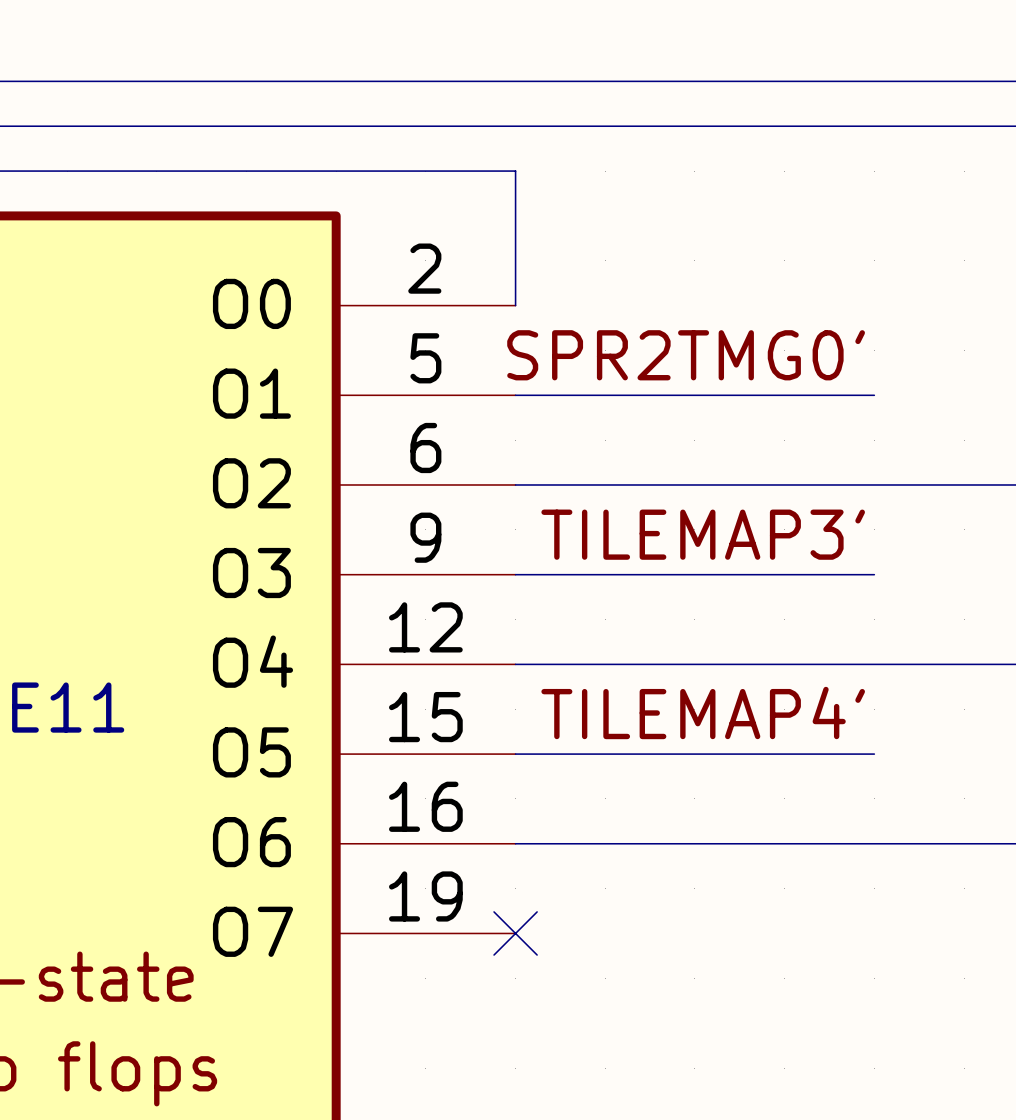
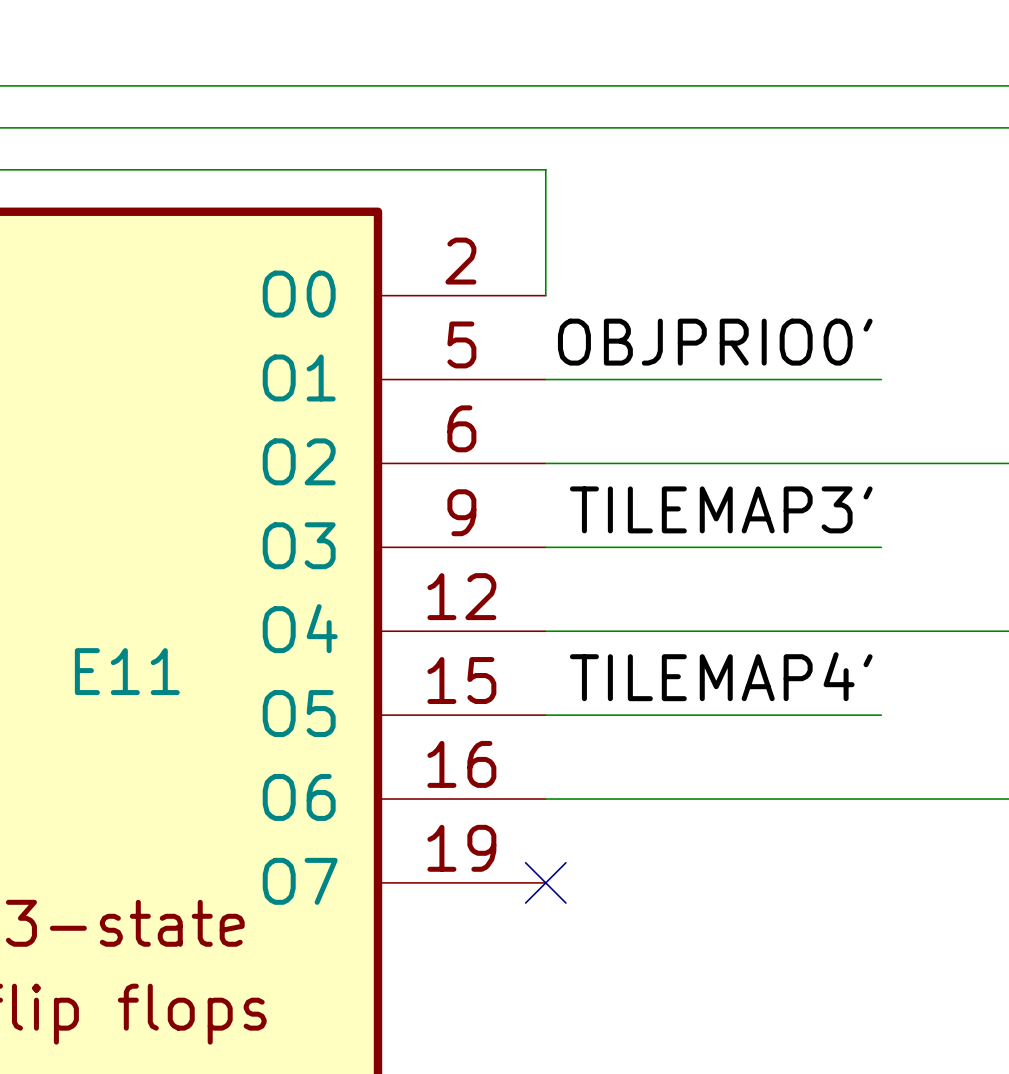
label: SPR2TMG0' (686, 355) -> OBJPRIO0' (715, 342)

